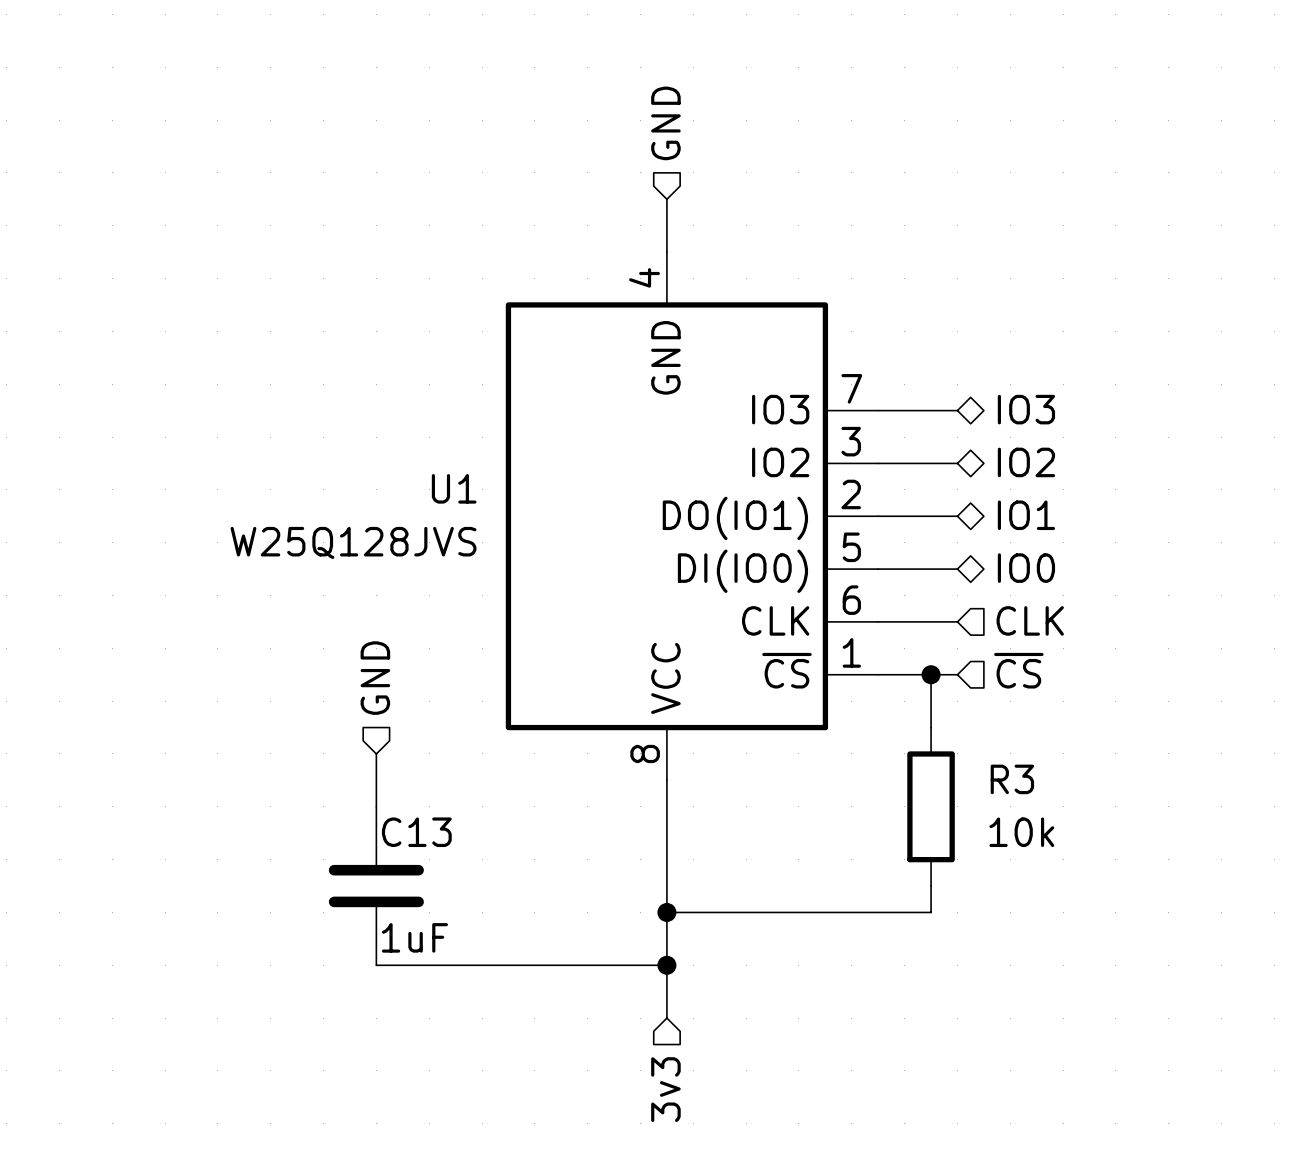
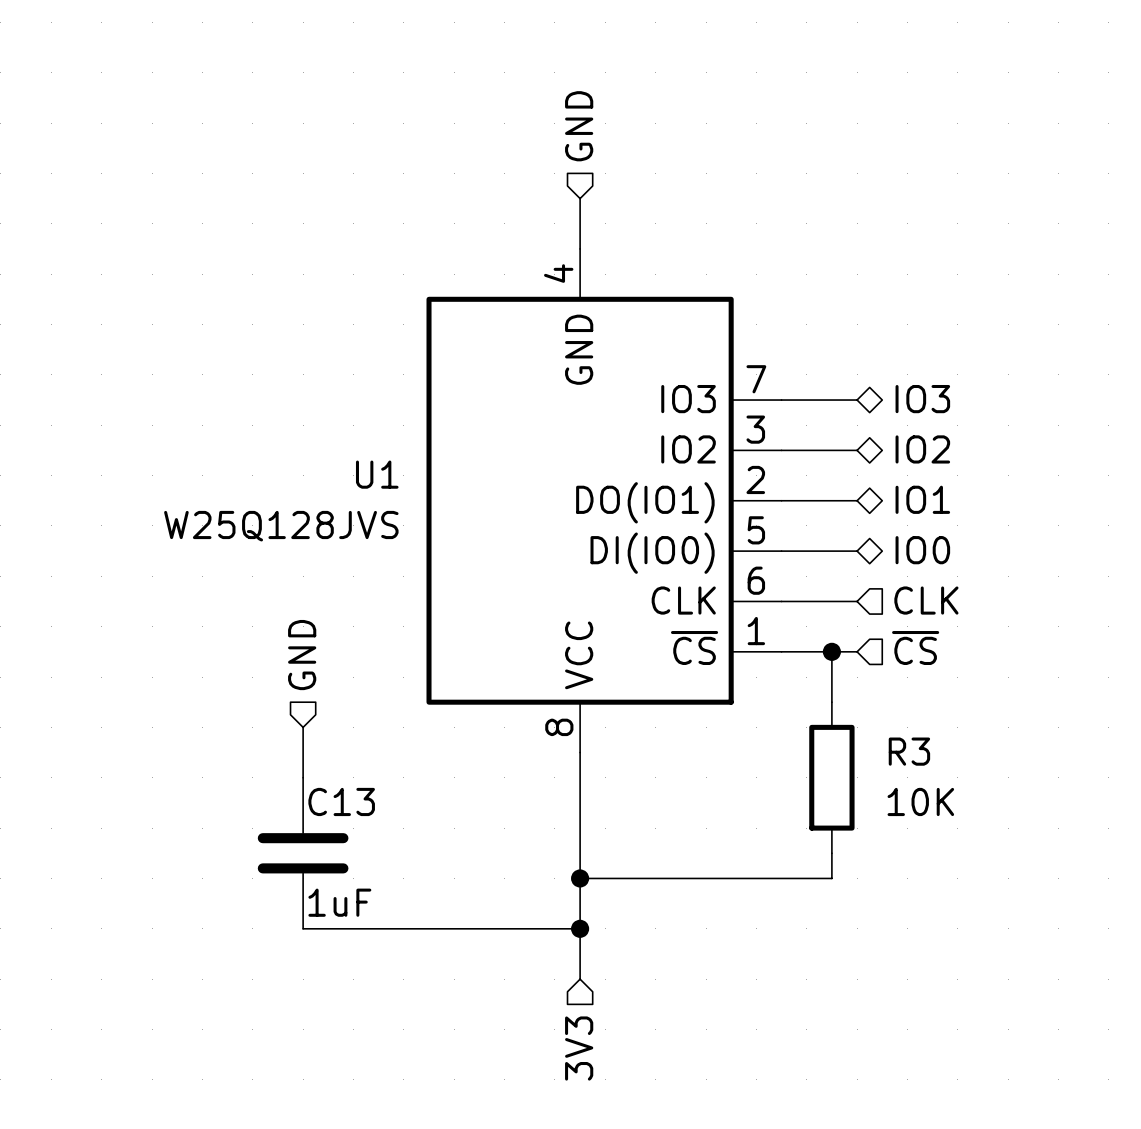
R3 value: 10k (1021, 832) -> 10K (920, 801)
hierarchical label: 3v3 (665, 1089) -> 3V3 (579, 1048)

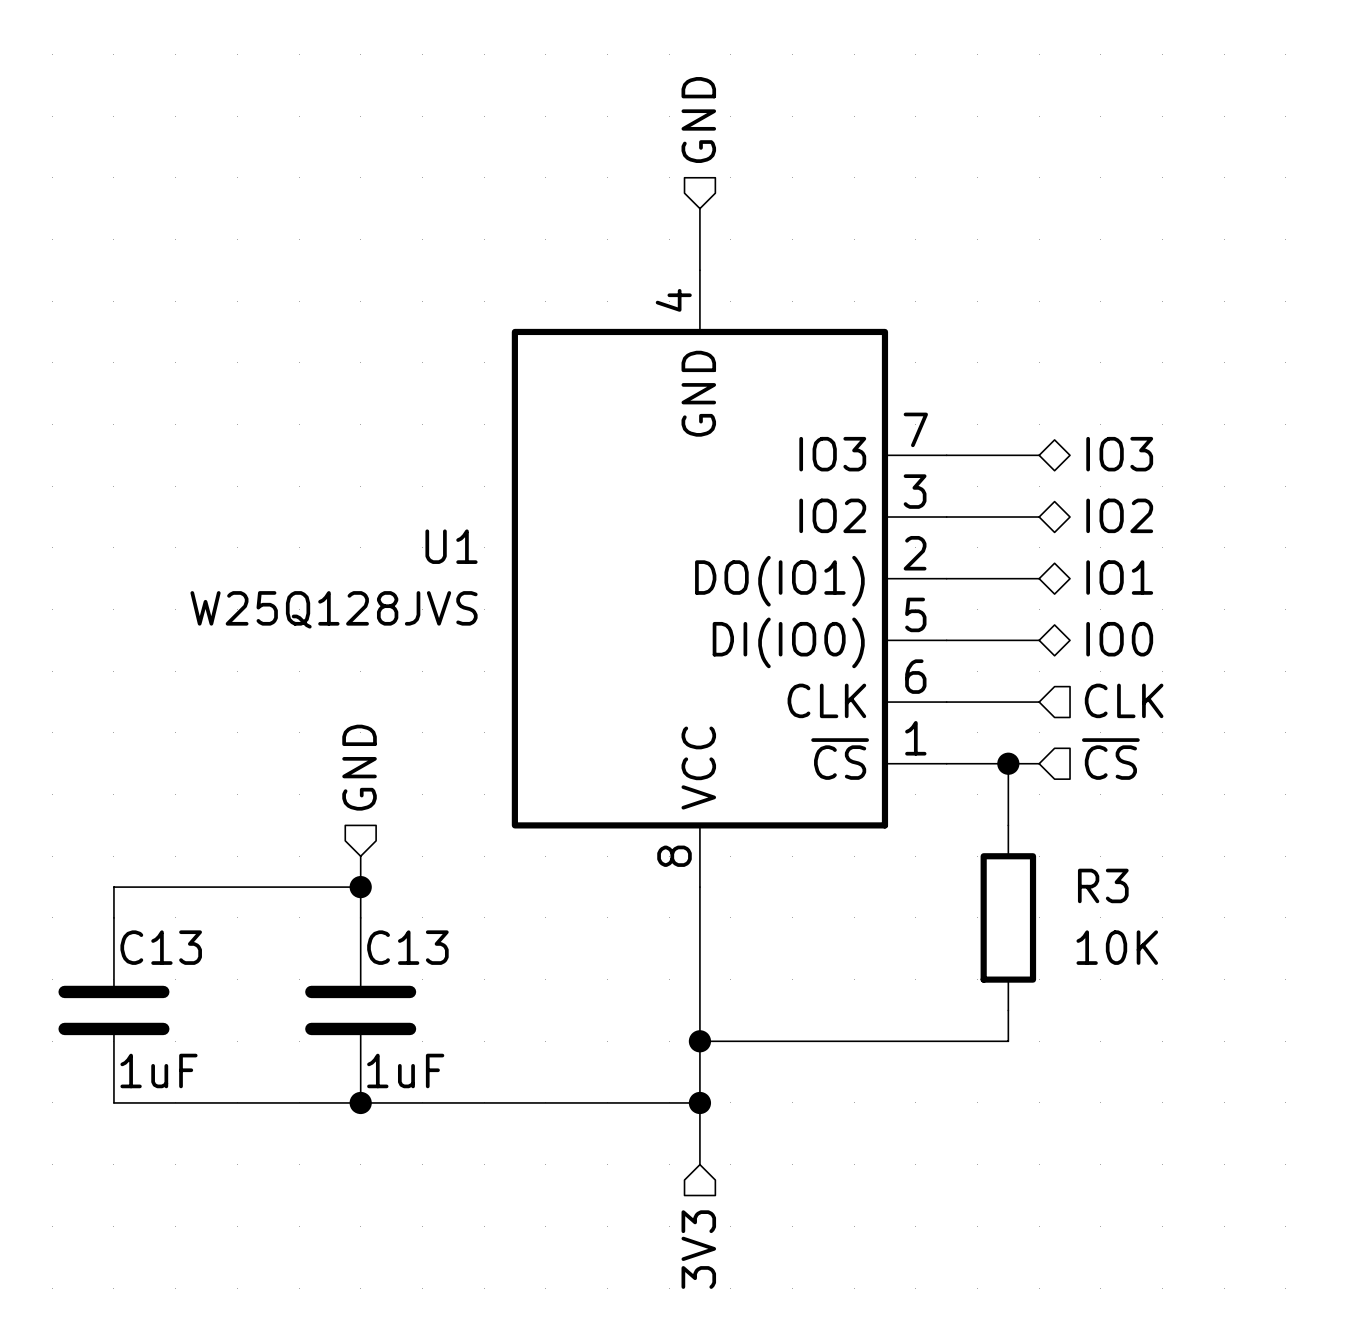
wire: none -> (360, 887) (113, 887) (113, 917)
junction: none -> (360, 887)
C13: none -> 1uF (113, 1010)
wire: none -> (113, 1102) (360, 1102)
junction: none -> (360, 1102)

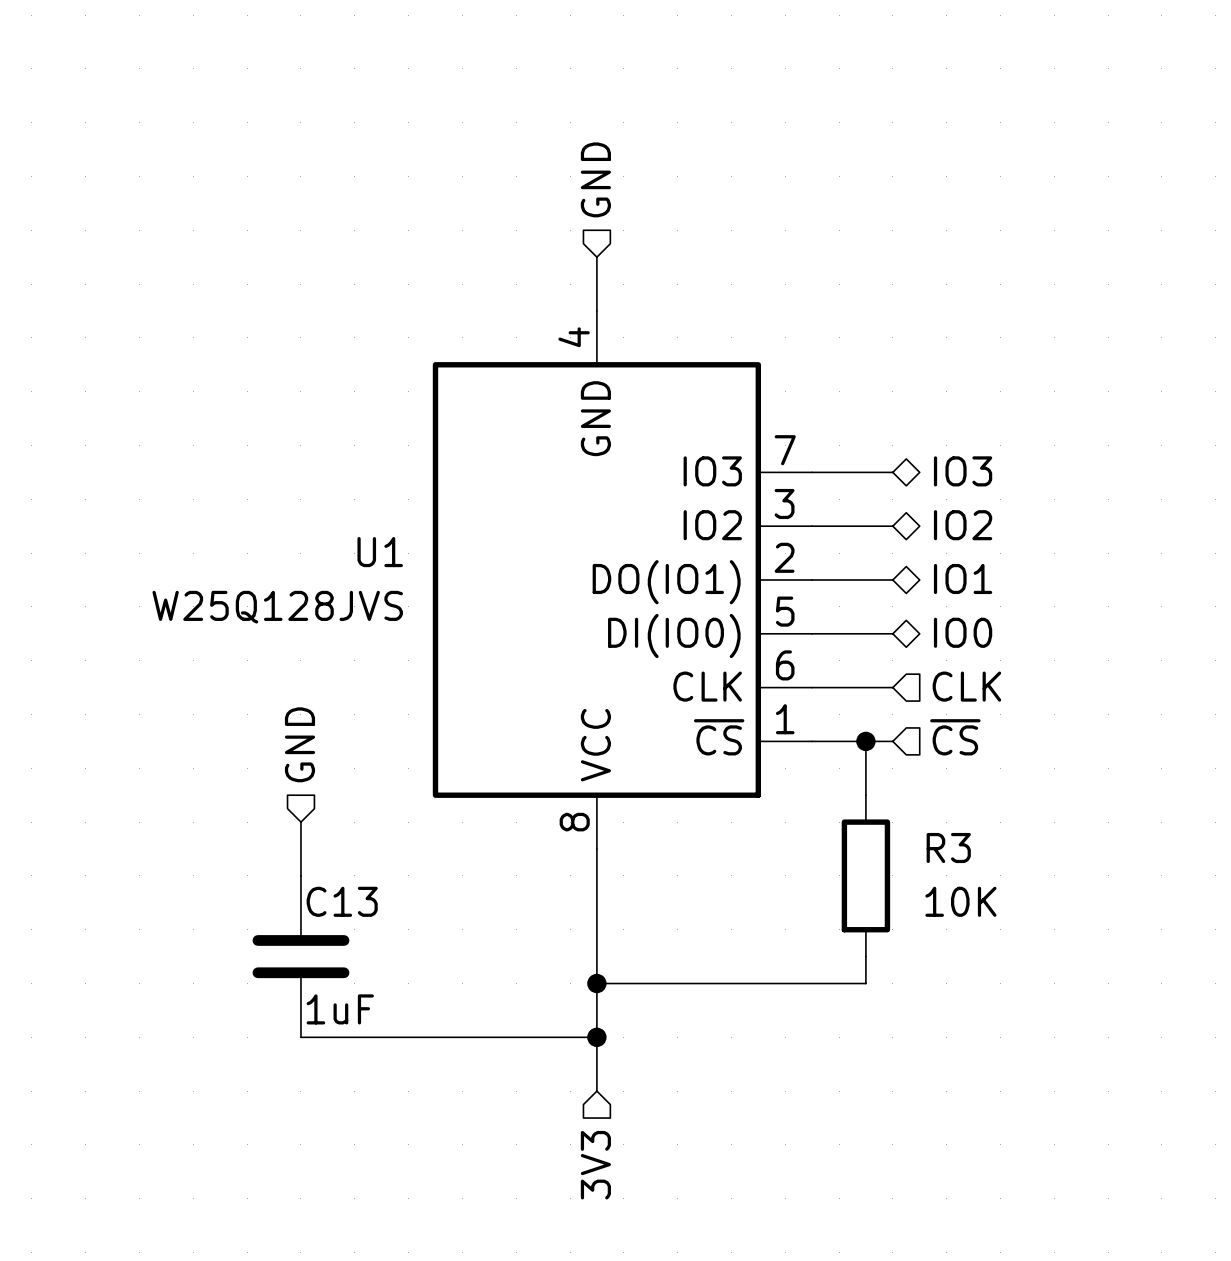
wire: (360, 887) (113, 887) (113, 917) -> none
junction: (360, 887) -> none
C13: 1uF (113, 1010) -> none
wire: (113, 1102) (360, 1102) -> none
junction: (360, 1102) -> none

